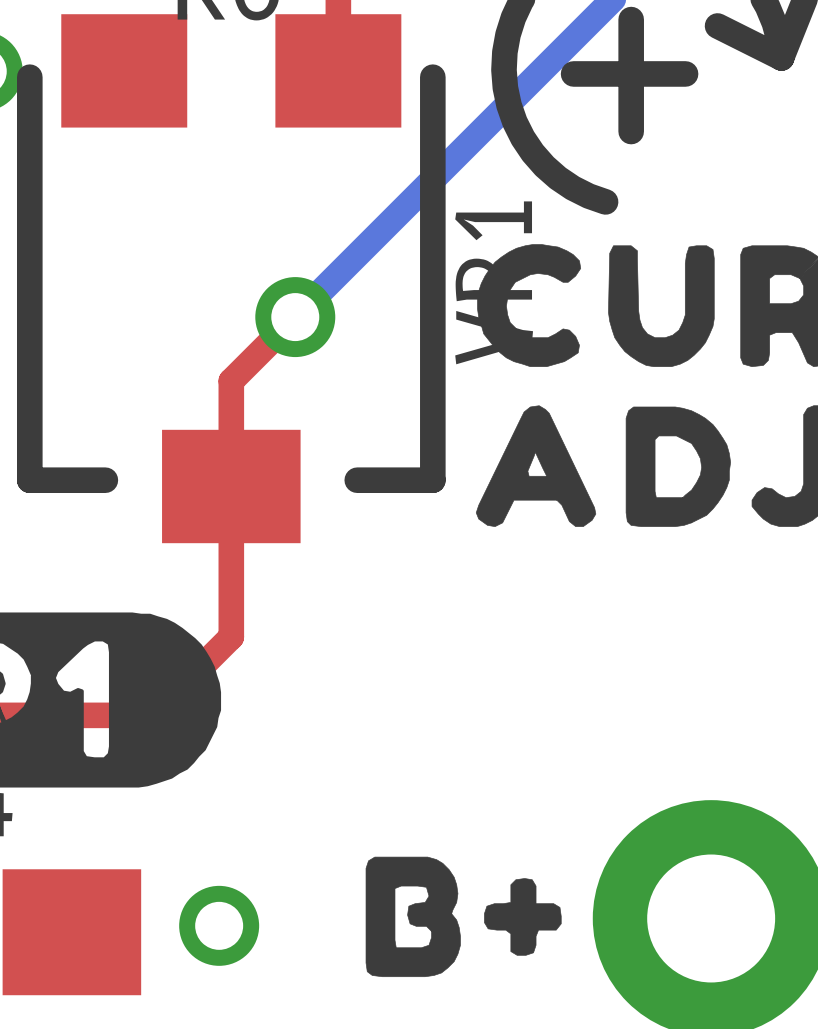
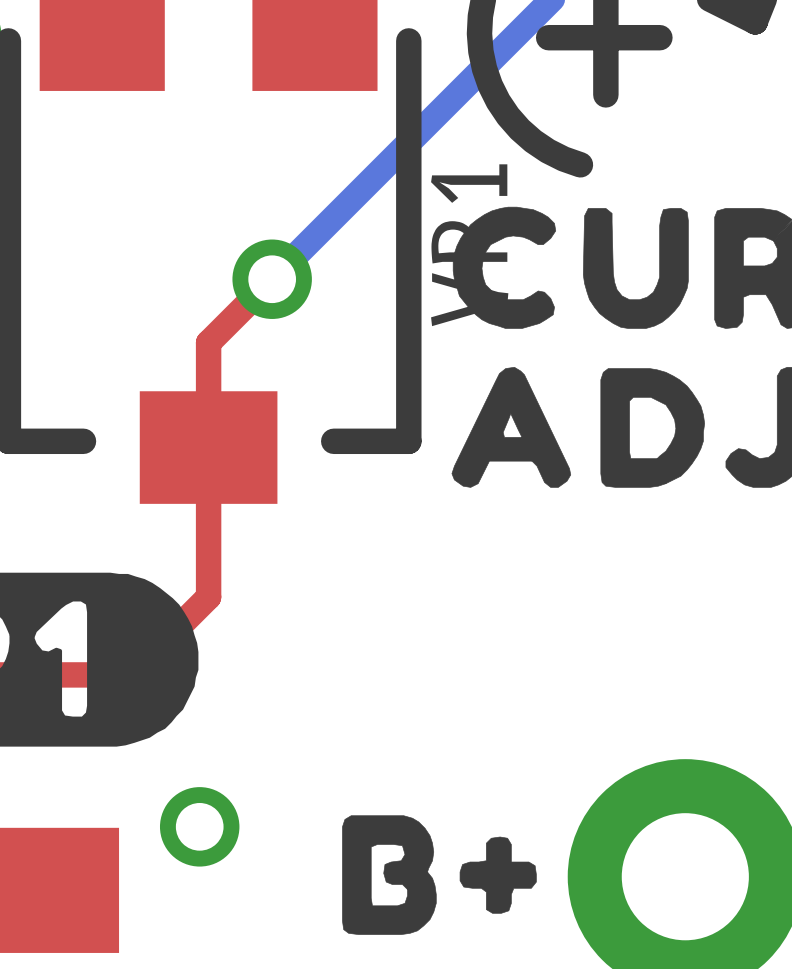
via position: (219, 925) -> (199, 826)

